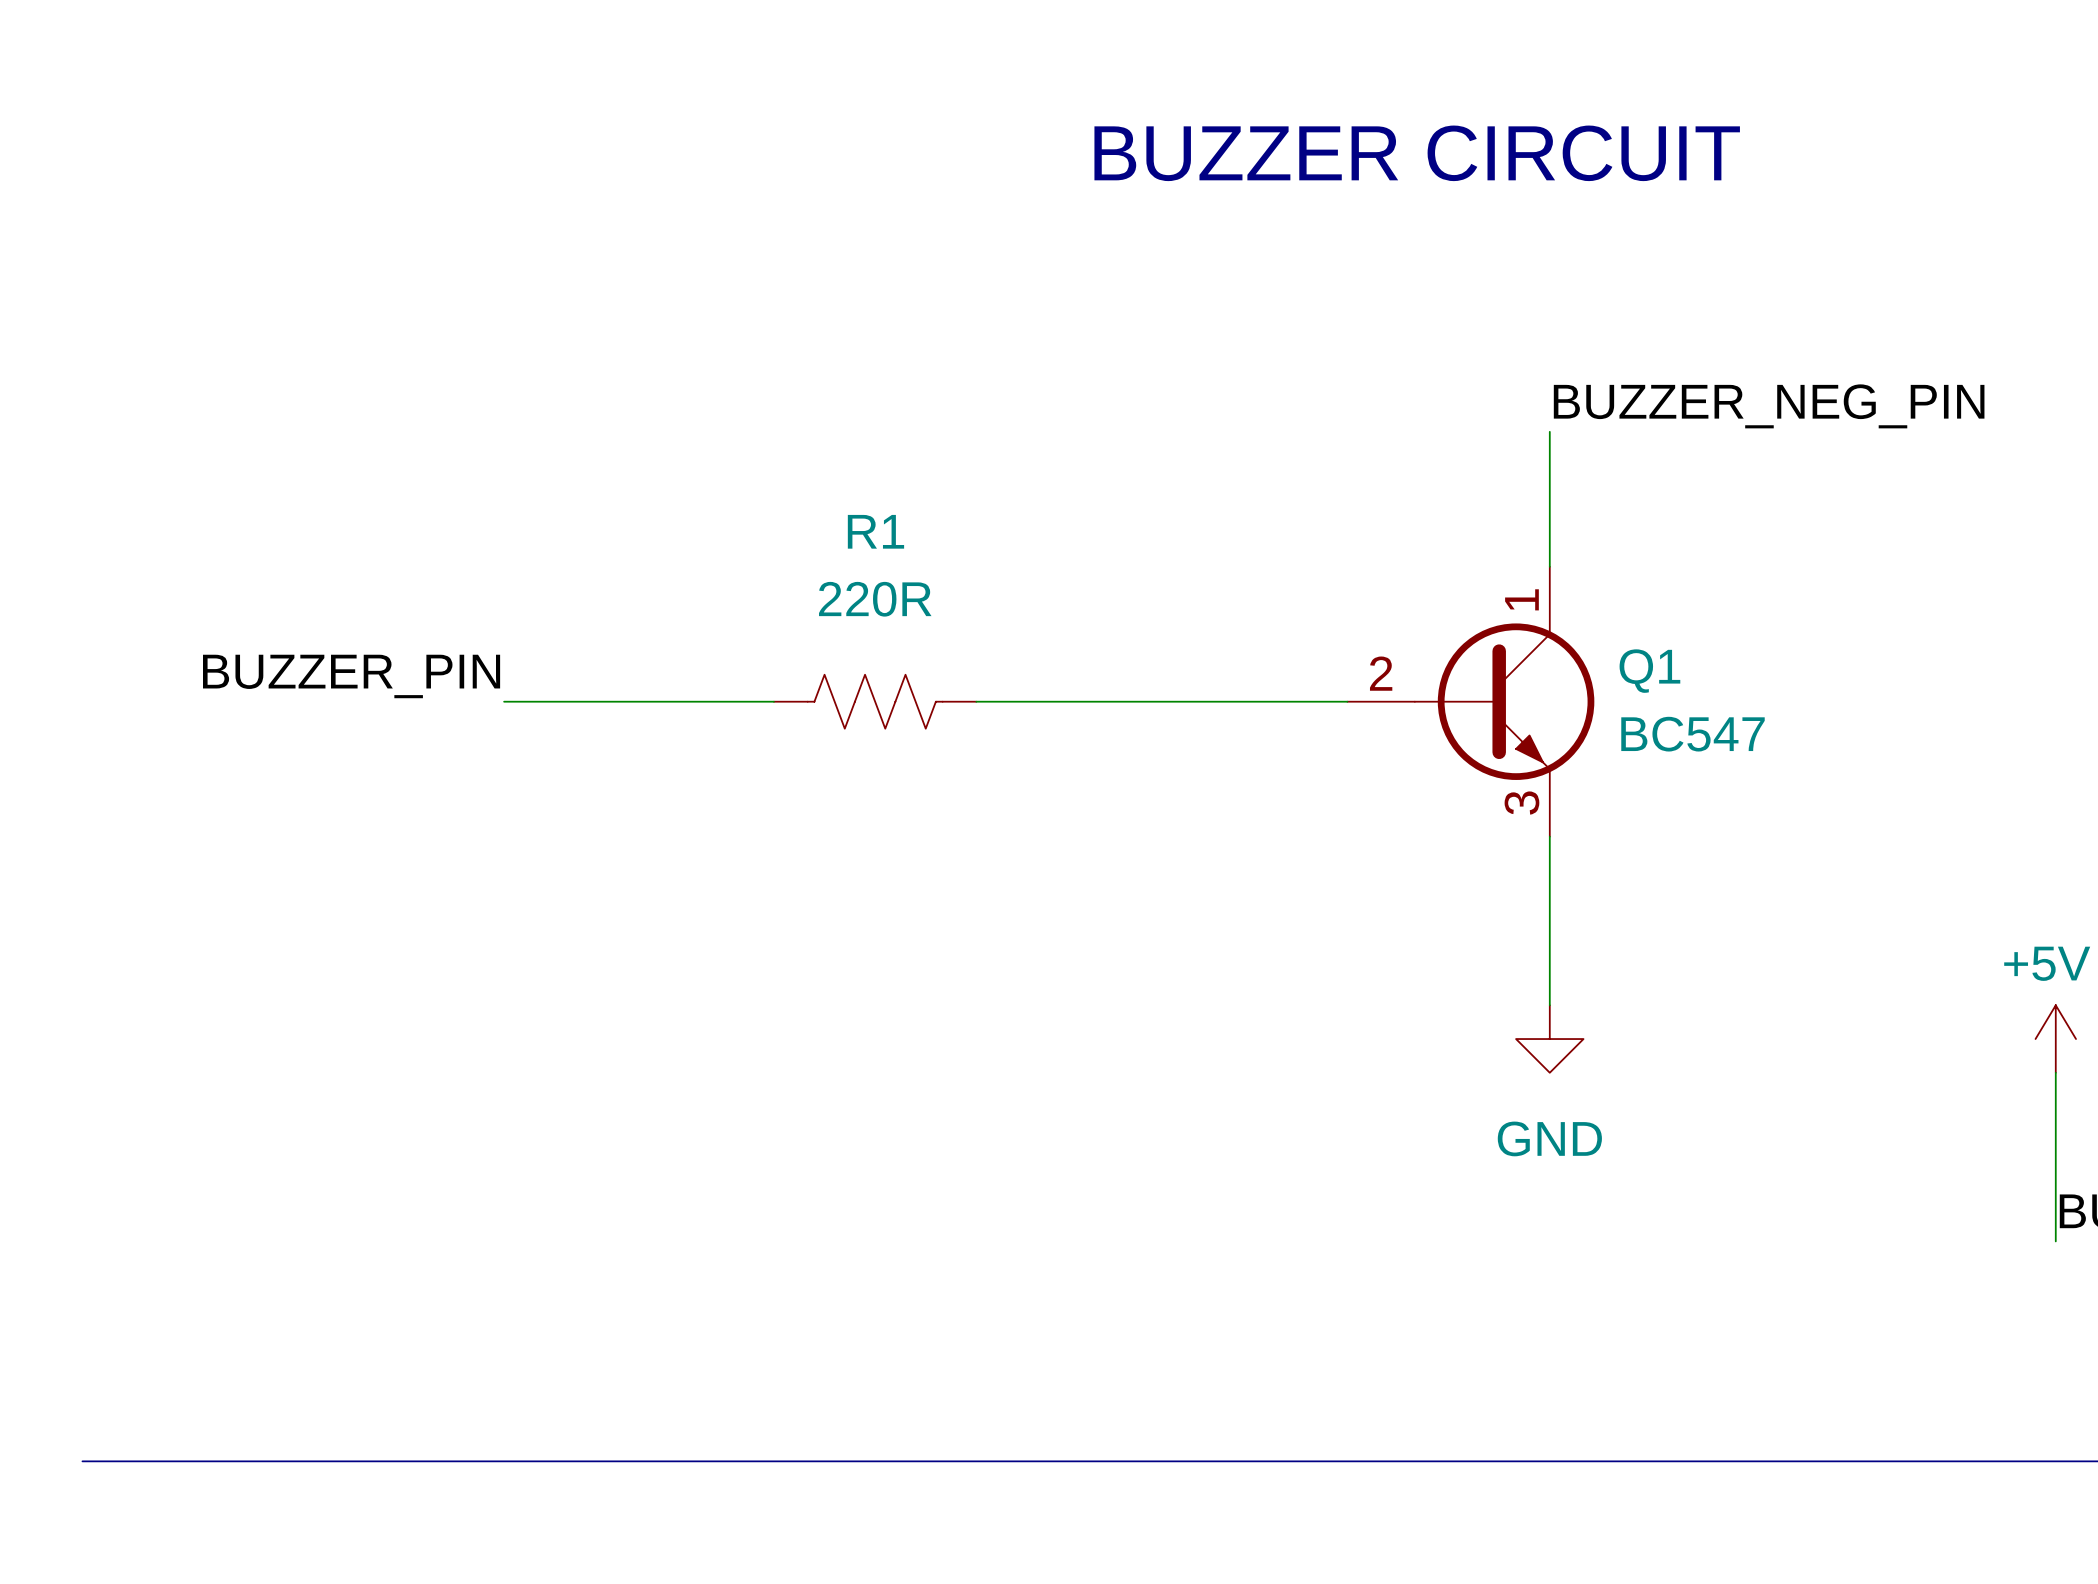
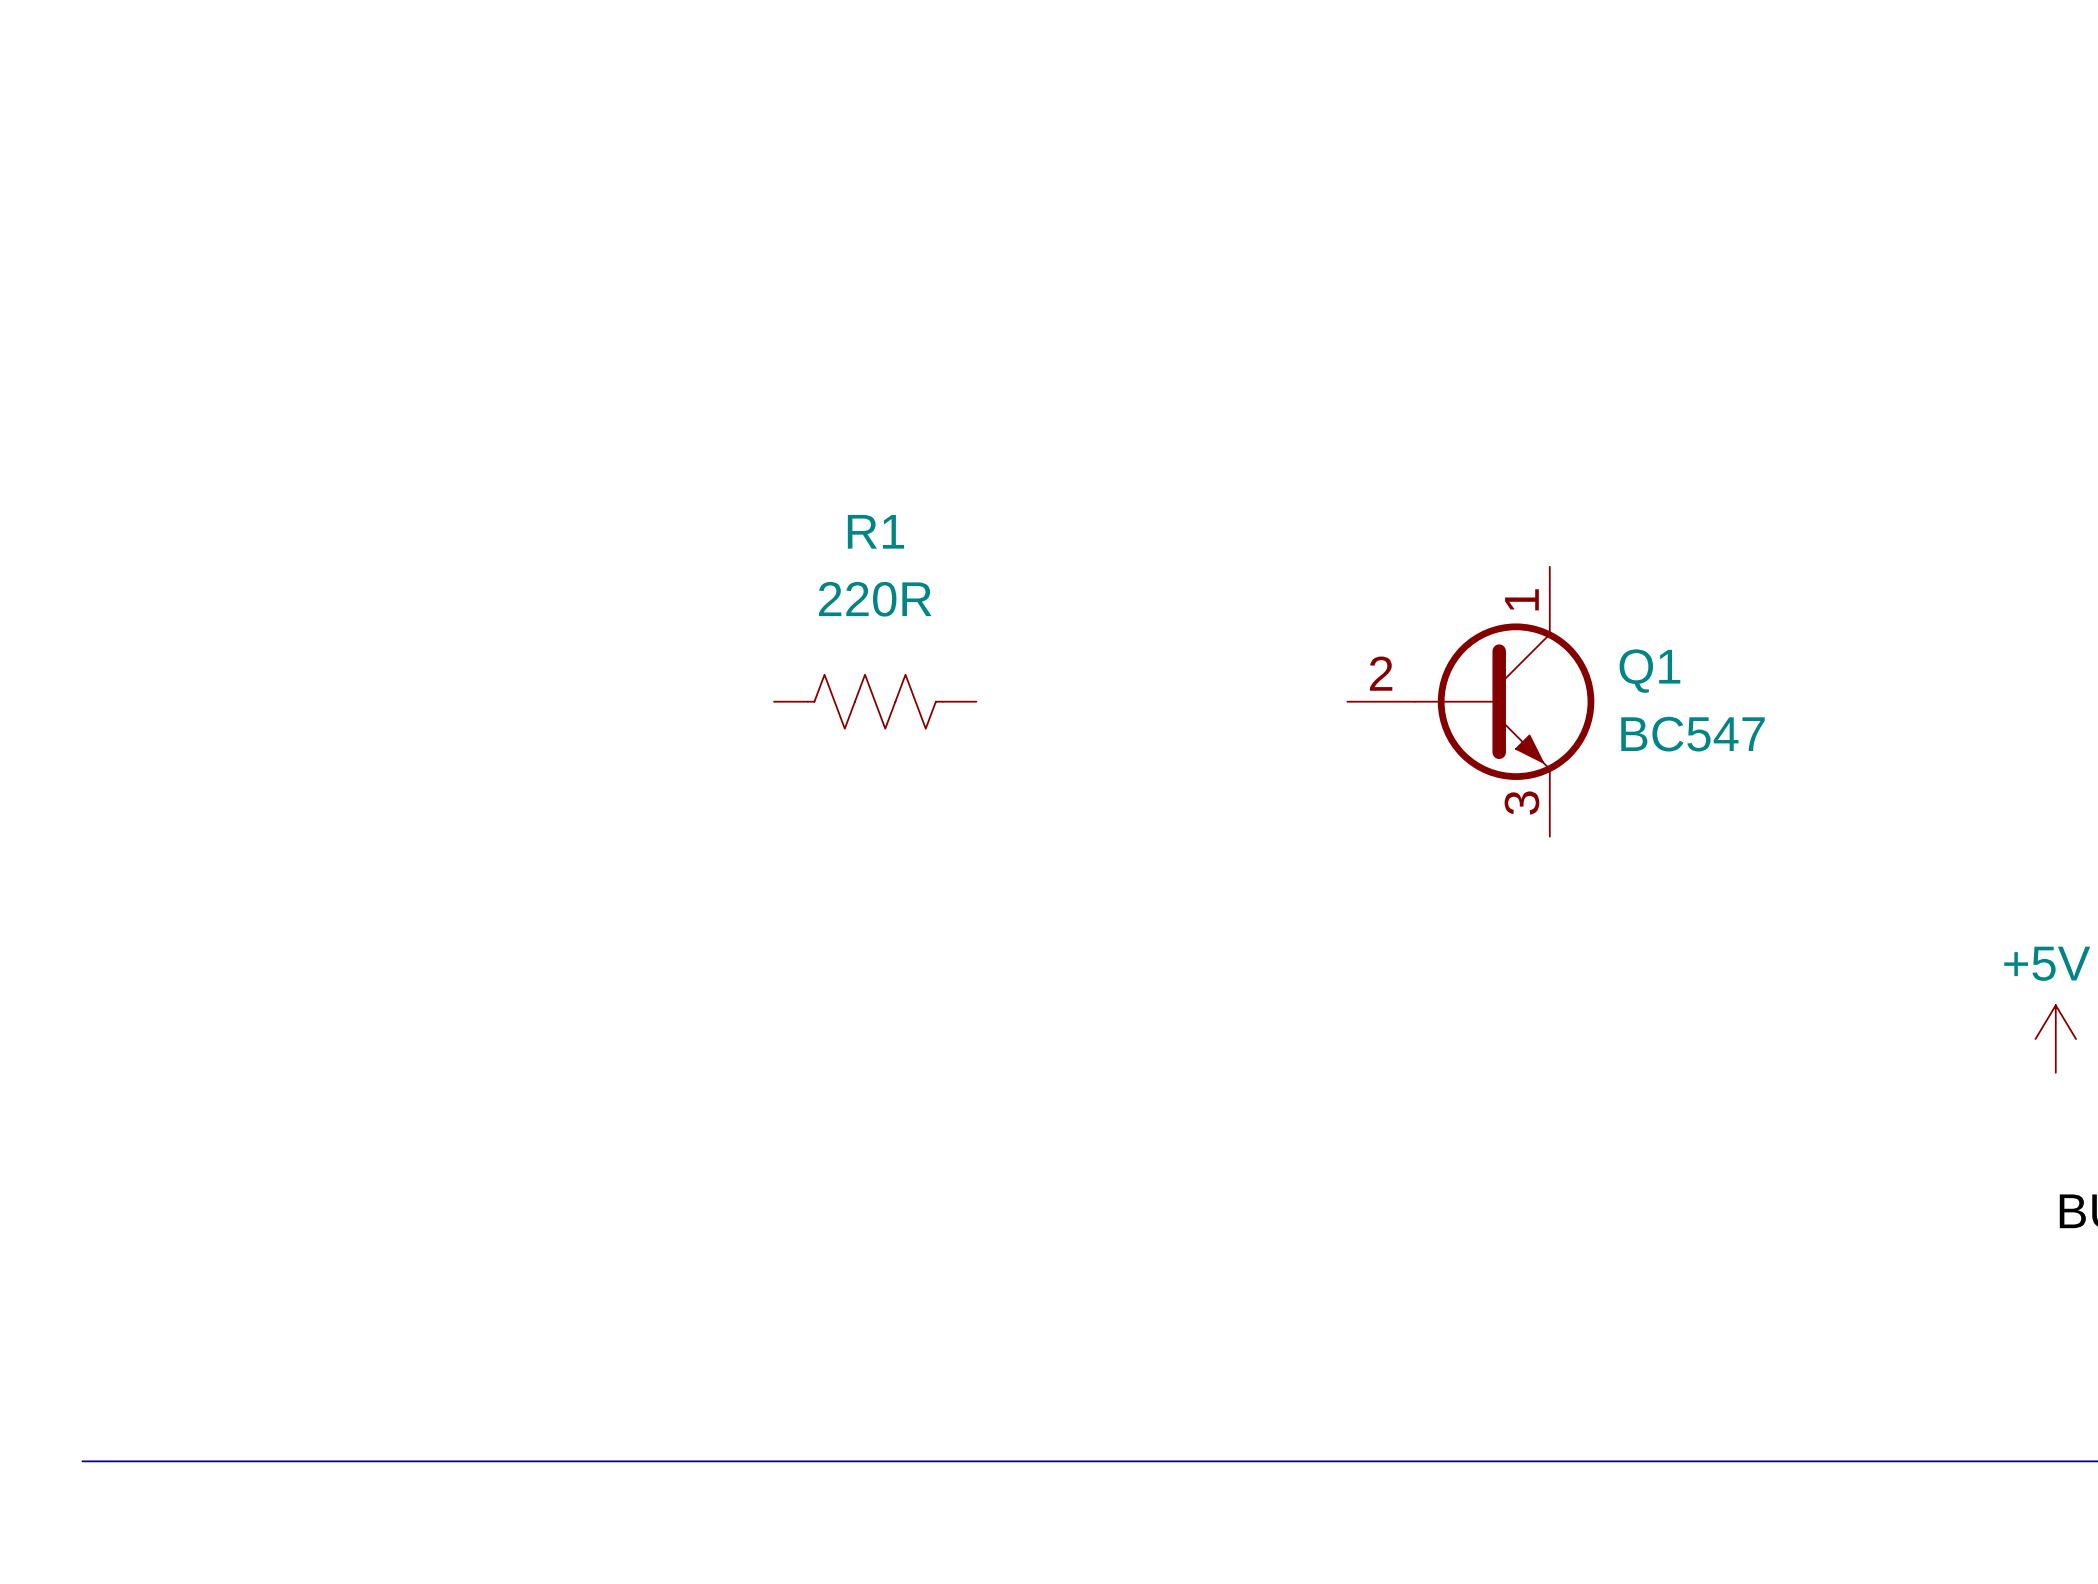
text: BUZZER CIRCUIT (1417, 153) -> none
label: BUZZER_NEG_PIN (1769, 406) -> none
wire: (1549, 431) (1549, 566) -> none
label: BUZZER_PIN (351, 676) -> none
wire: (504, 701) (773, 701) -> none
wire: (976, 701) (1347, 701) -> none
wire: (1549, 836) (1549, 1005) -> none
power symbol: GND (1549, 1039) -> none
wire: (2055, 1072) (2055, 1241) -> none

